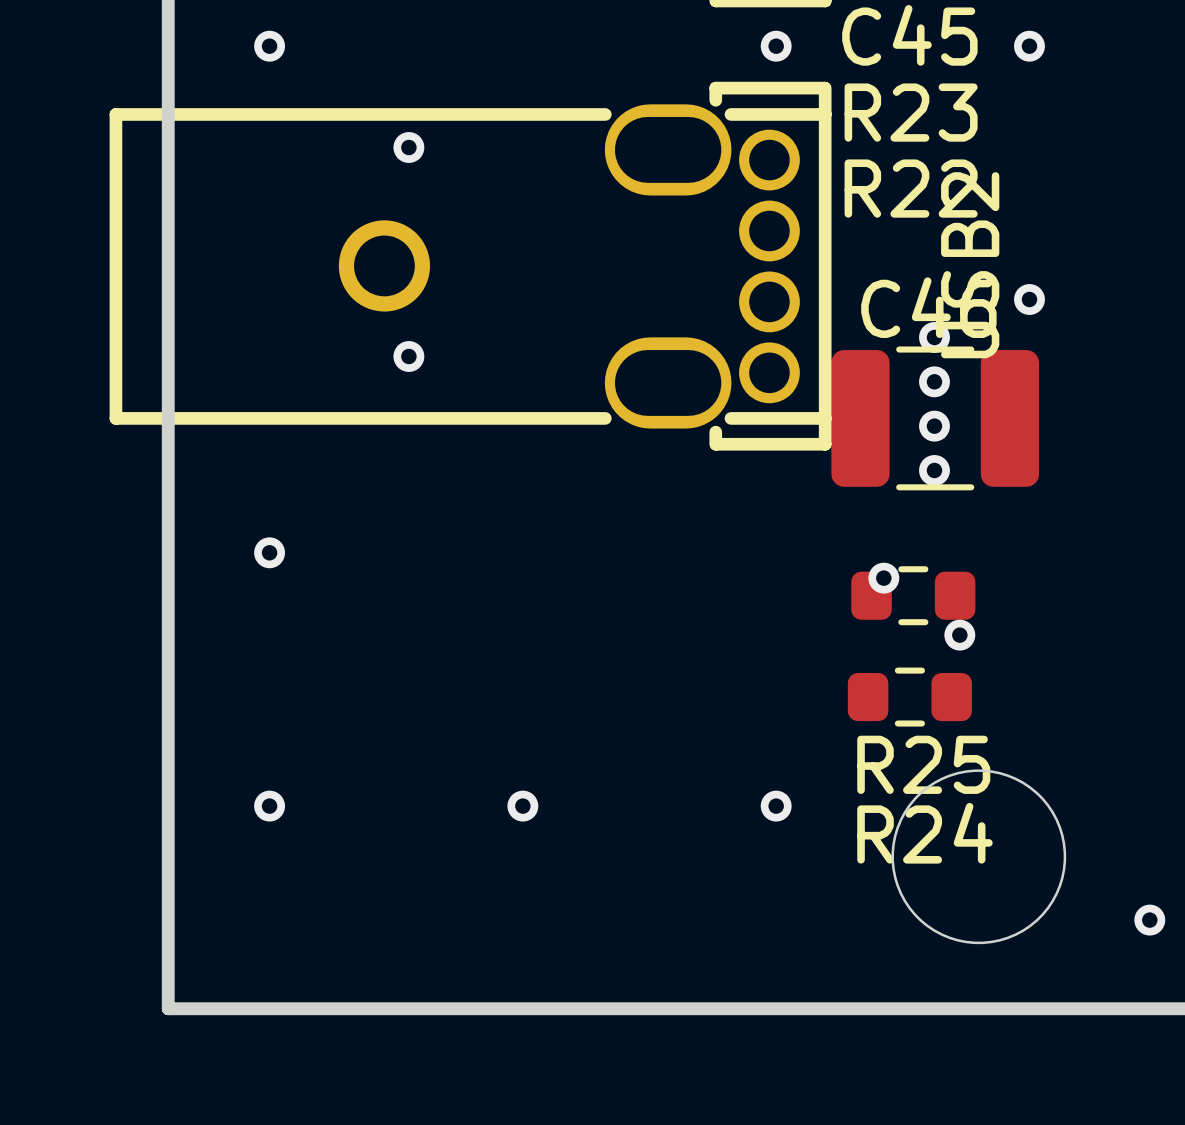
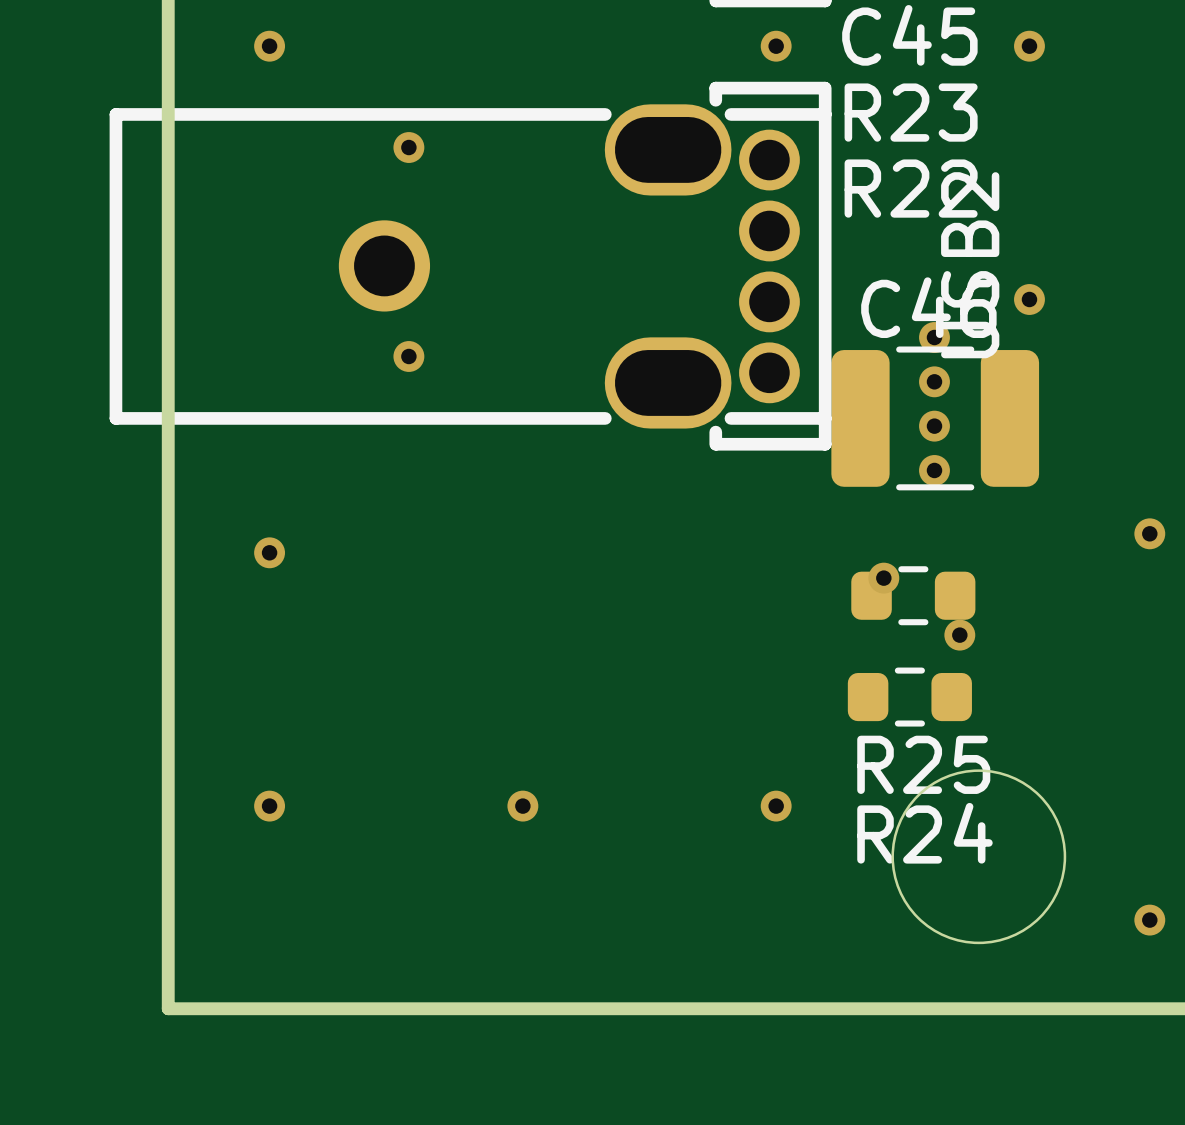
via: none -> (1149, 533)

